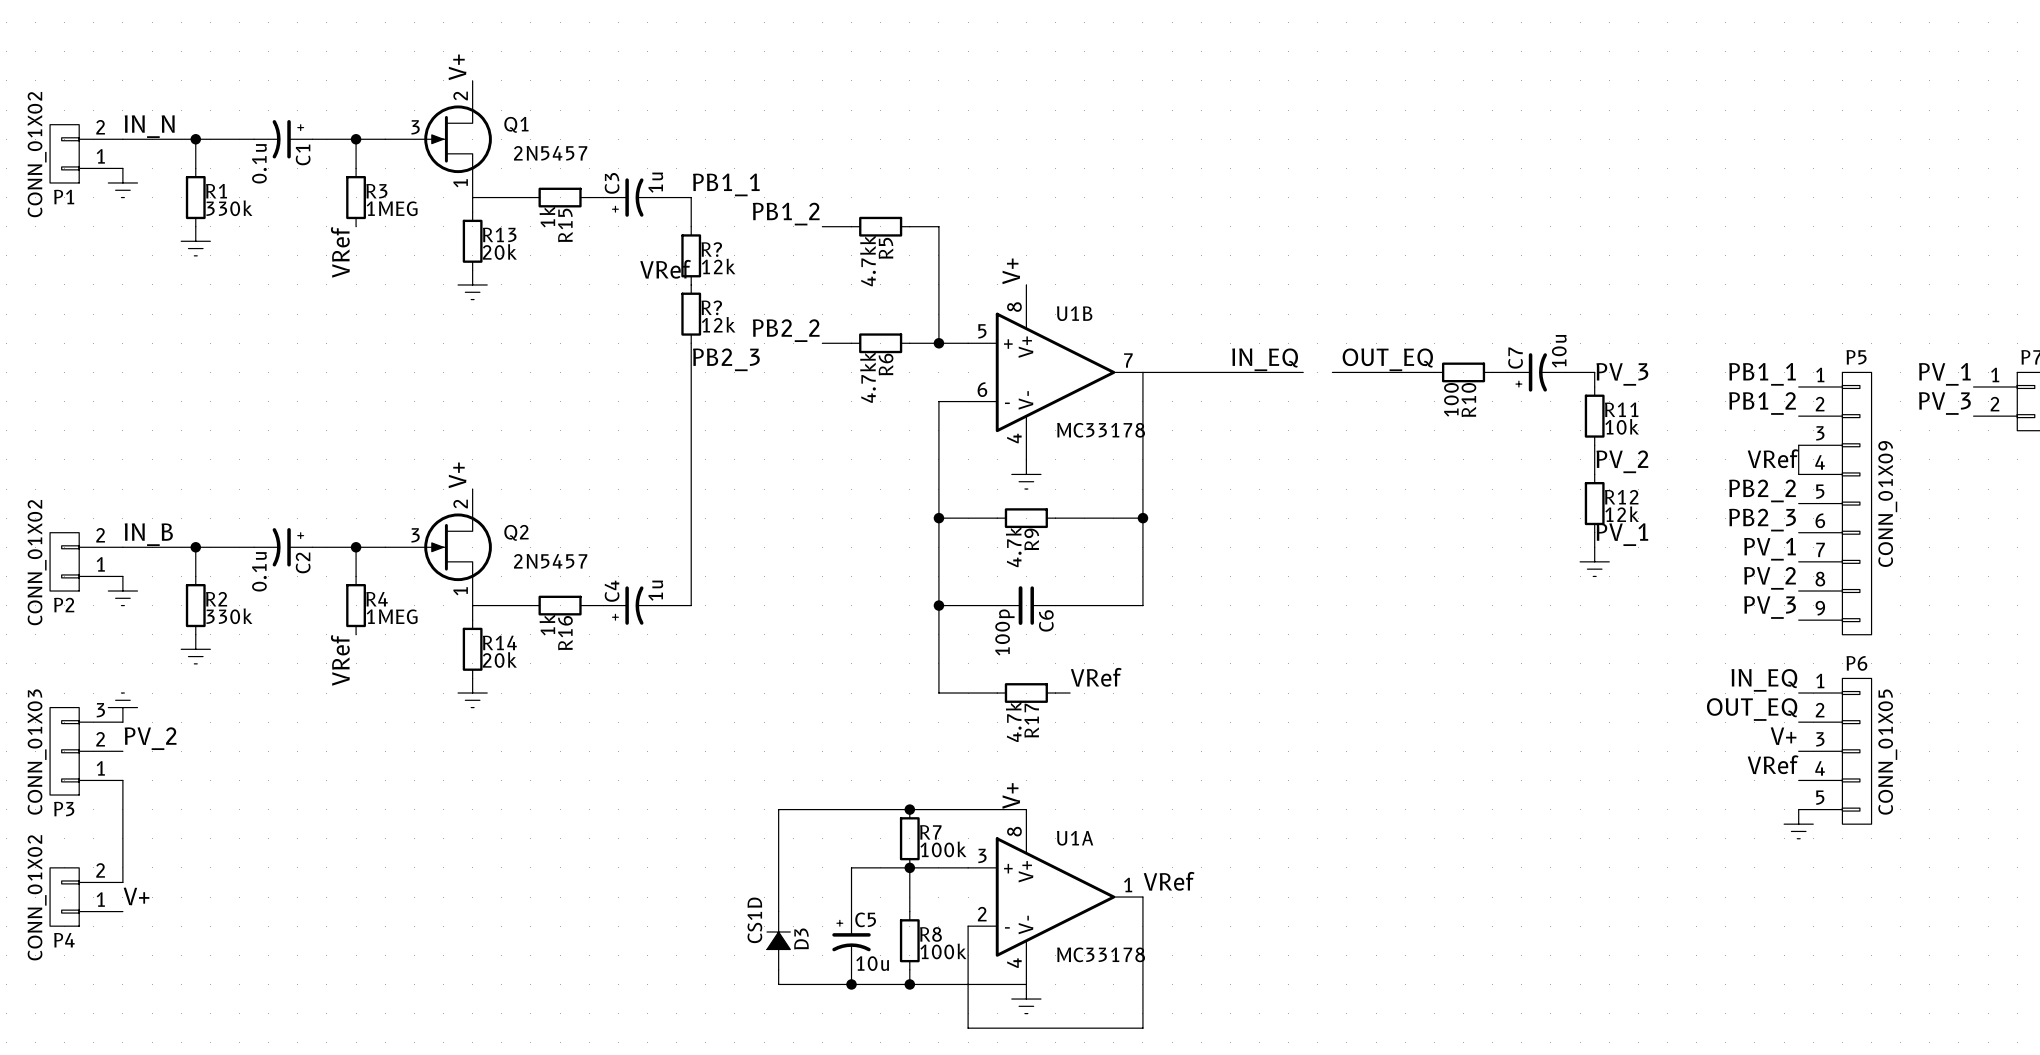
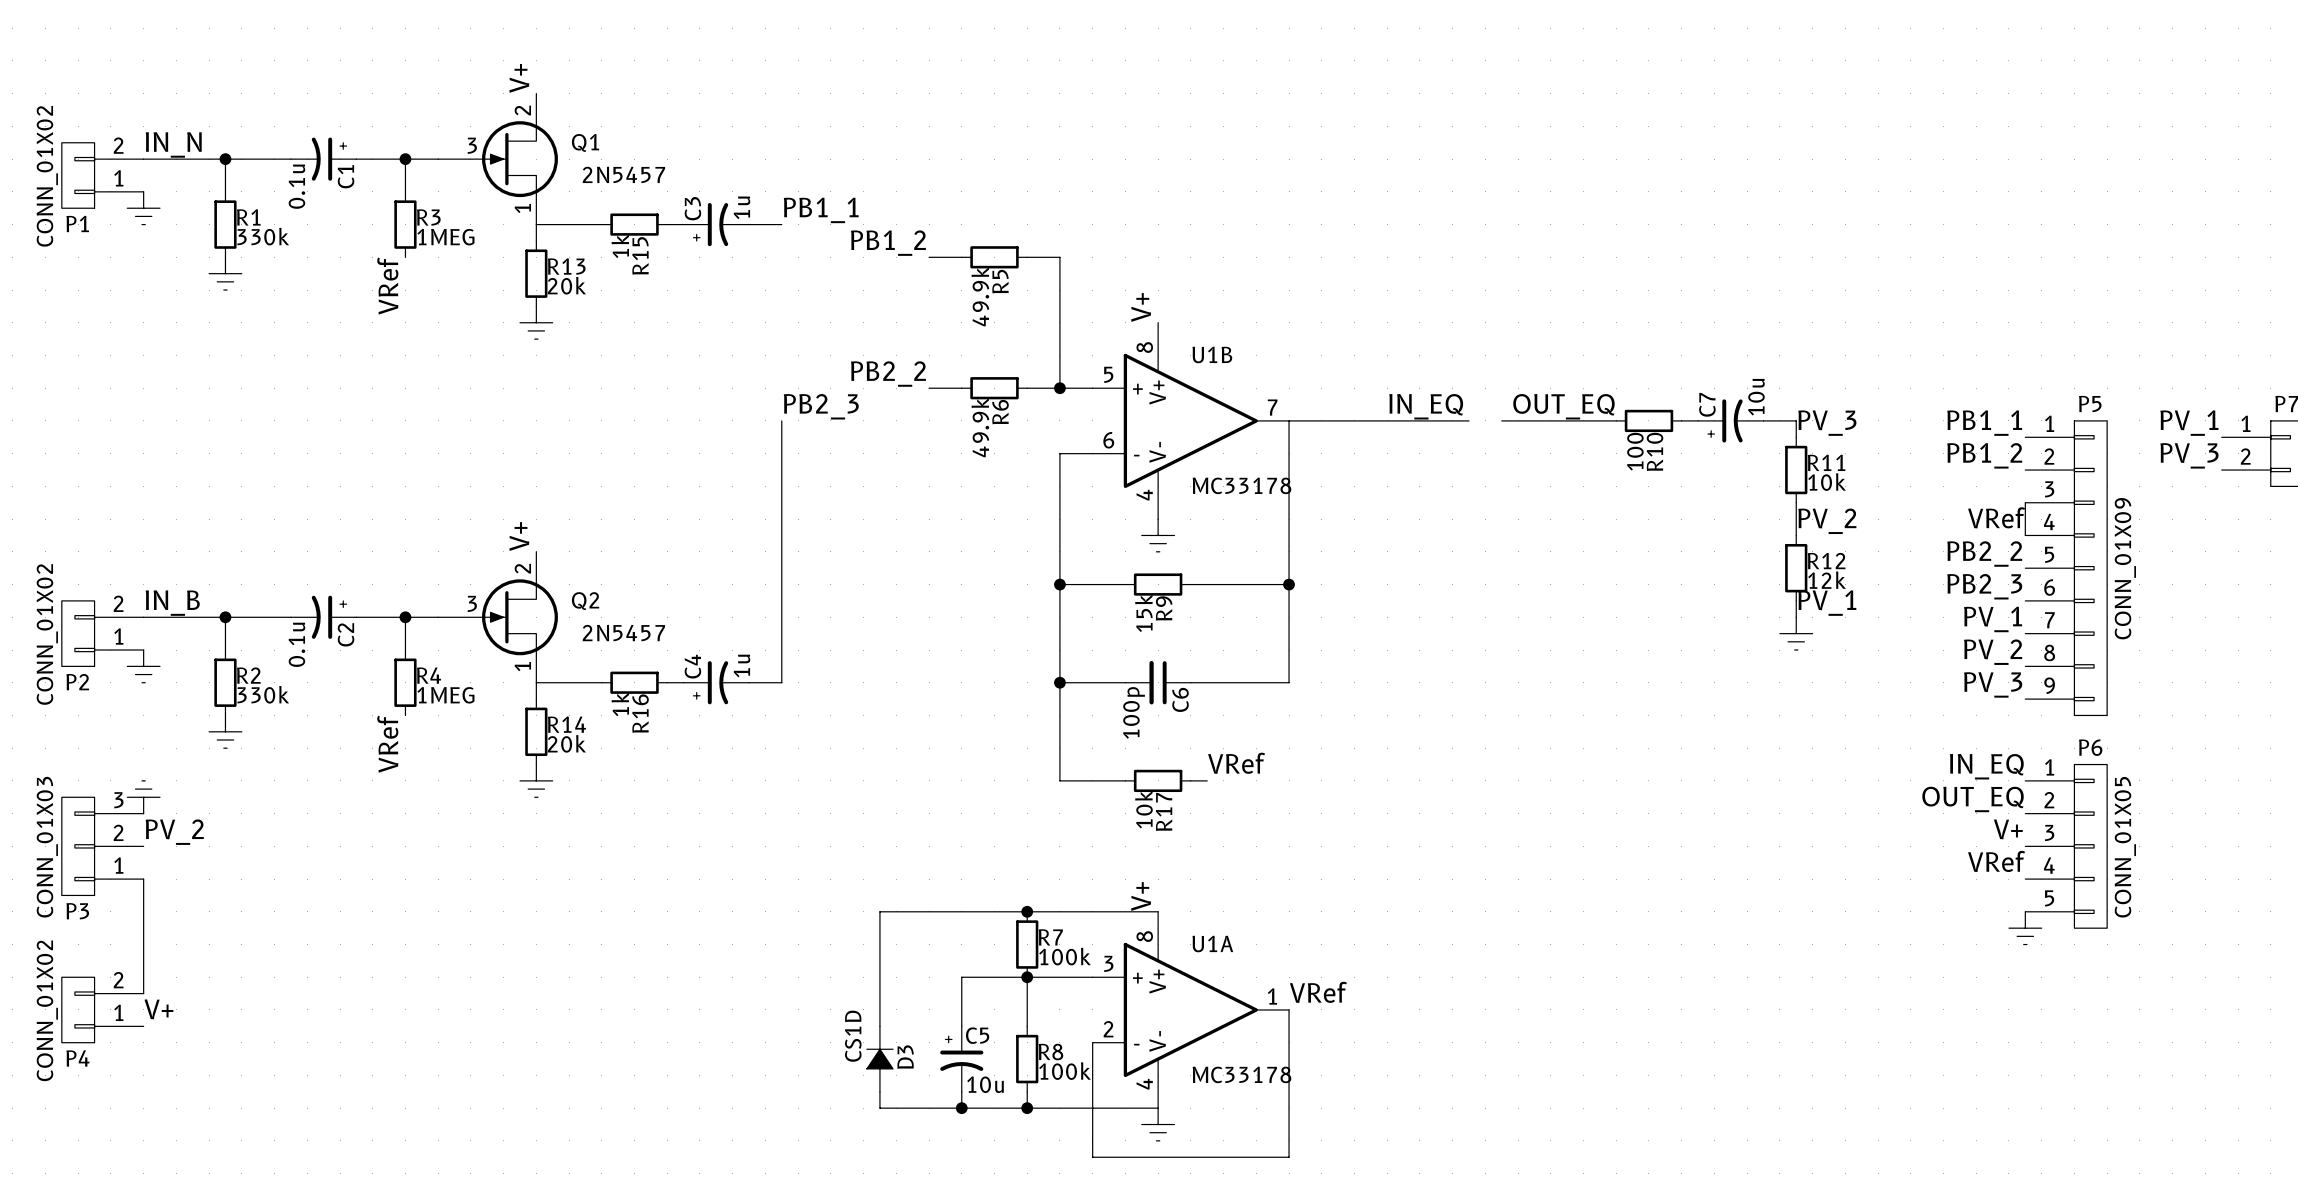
wire: (691, 197) (691, 226) -> none
R?: 12k (691, 255) -> none
R5 value: 4.7kk (868, 260) -> 49.9k (980, 296)
label: VRef (665, 269) -> none
R?: 12k (691, 314) -> none
wire: (691, 343) (691, 372) -> none
R6 value: 4.7kk (868, 377) -> 49.9k (980, 427)
R9 value: 4.7k (1013, 547) -> 15k (1143, 613)
R17 value: 4.7k (1013, 721) -> 10k (1143, 809)

